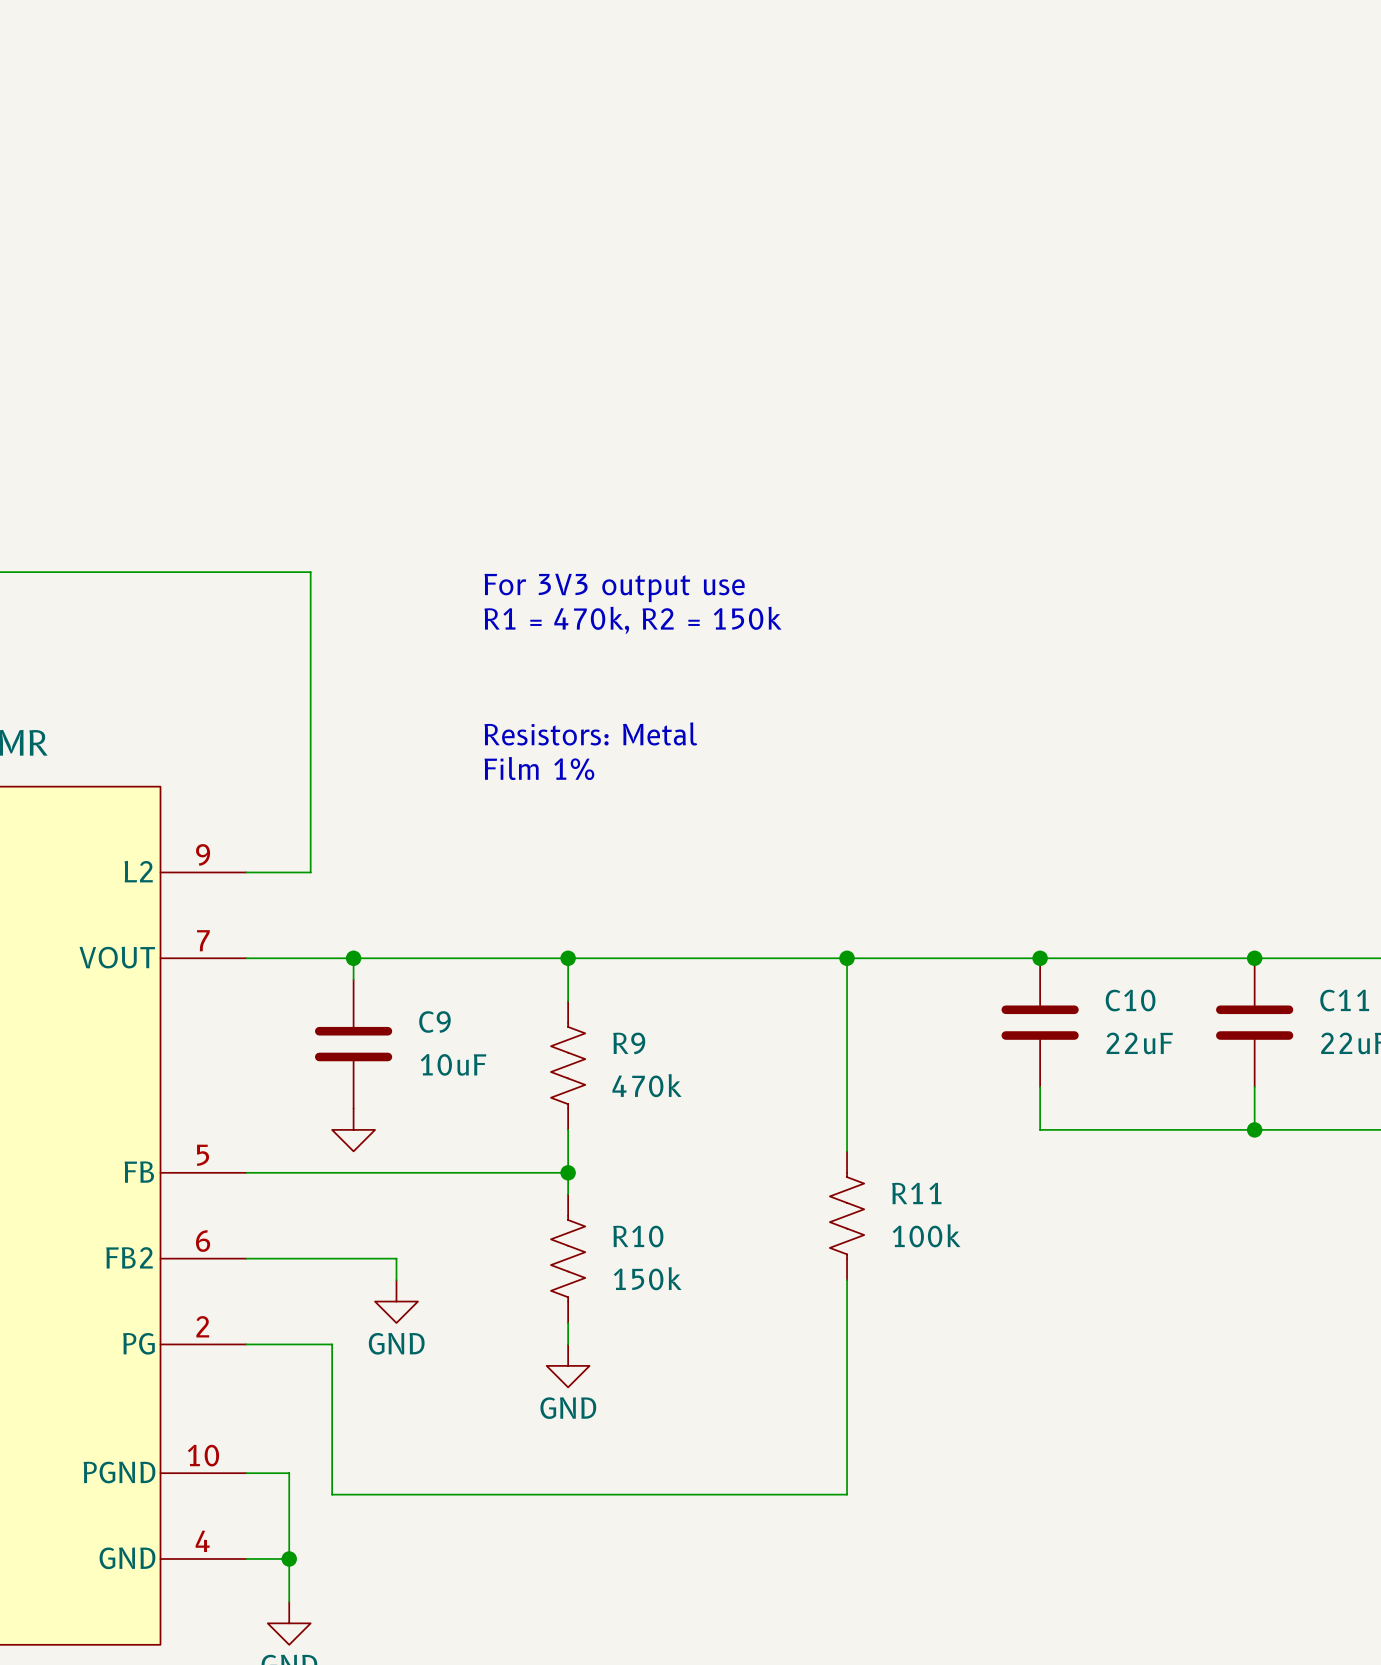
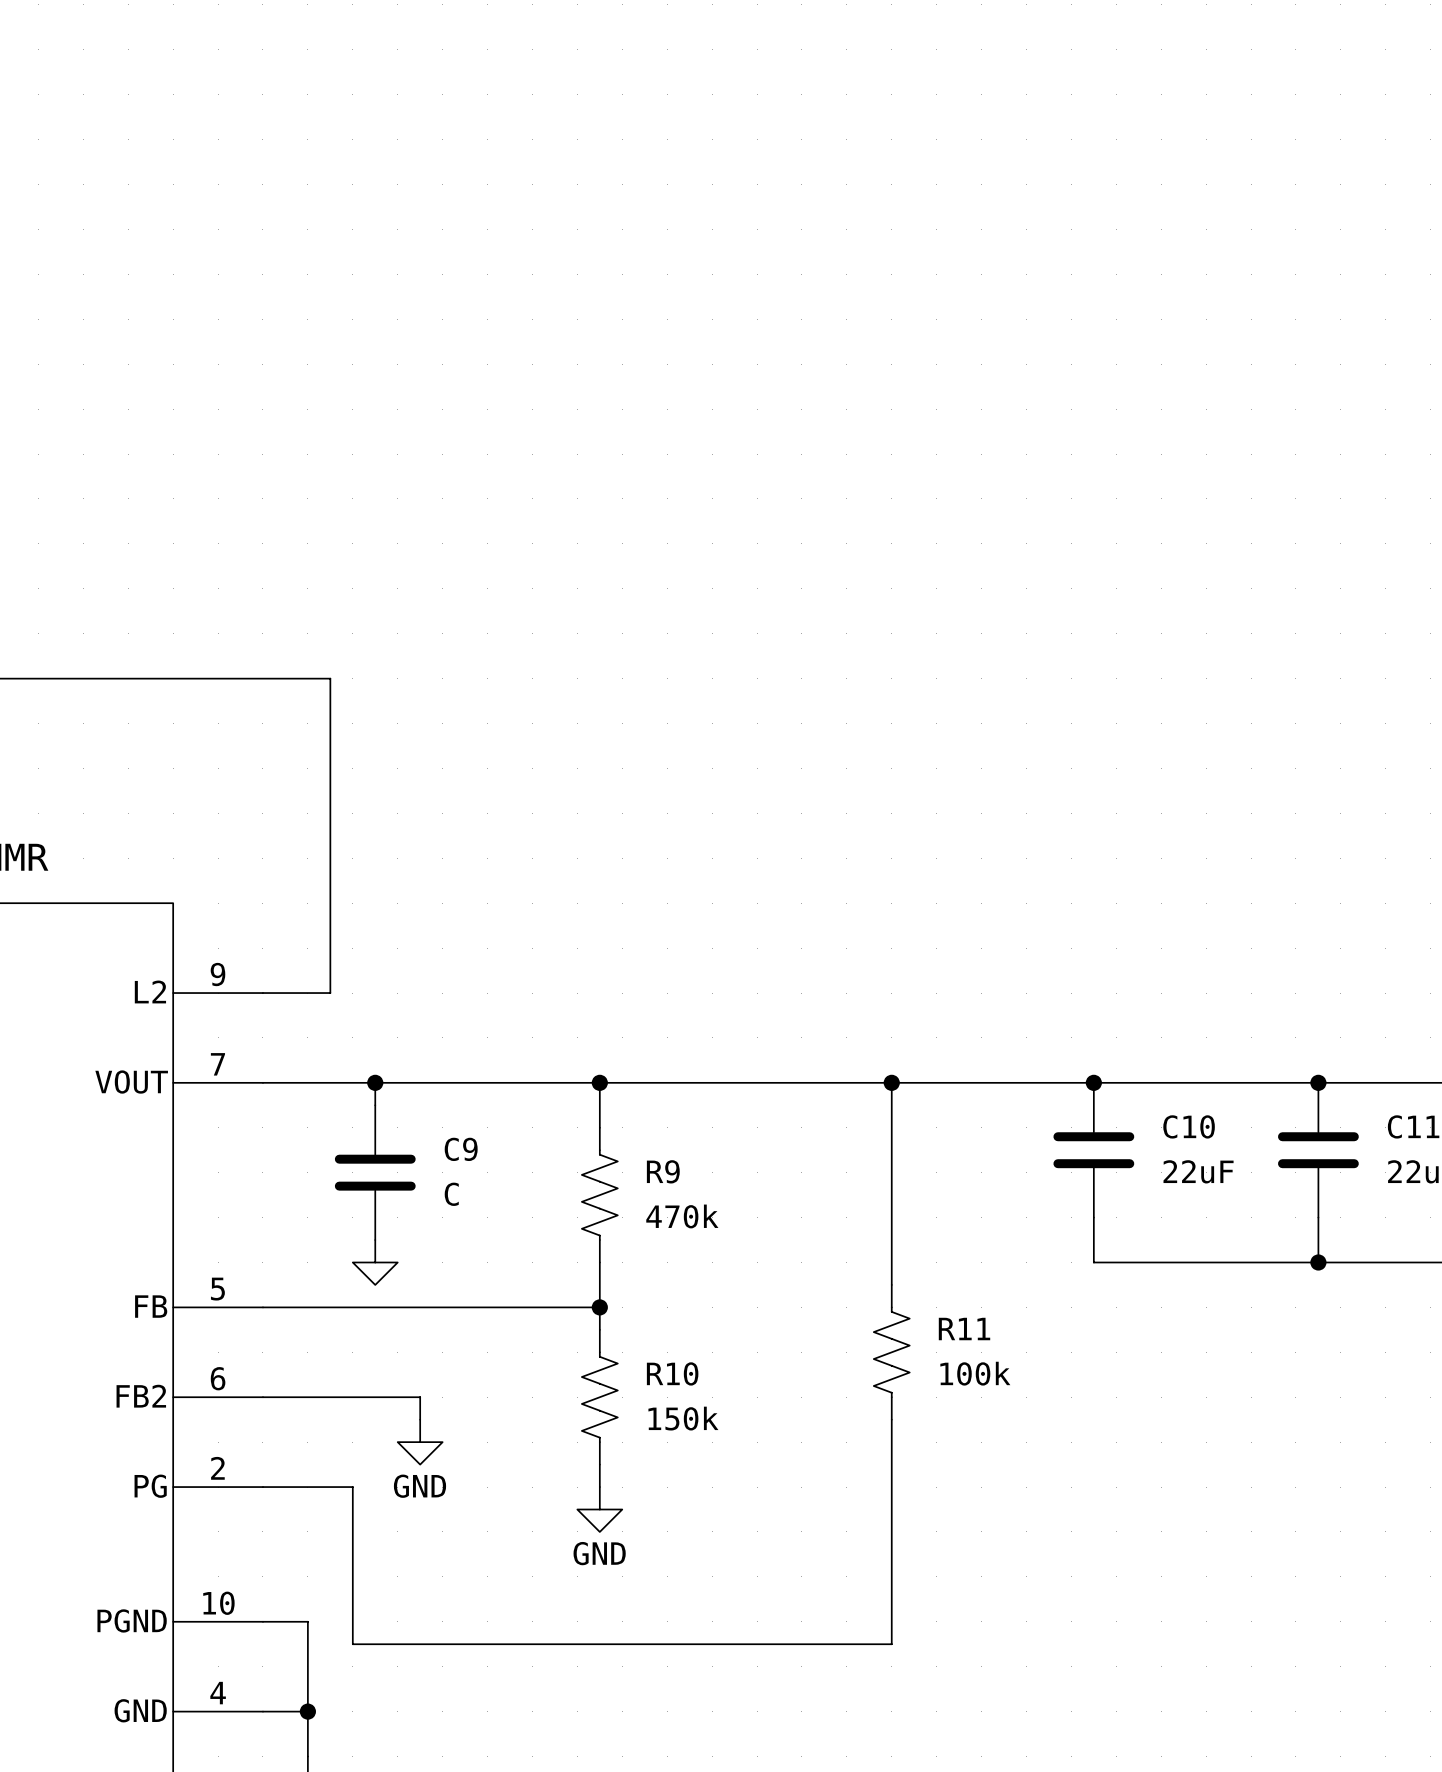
text: For 3V3 output use (614, 587) -> none
text: R1 = 470k, R2 = 150k (633, 620) -> none
text: Resistors: Metal (590, 733) -> none
text: Film 1% (539, 768) -> none
C9 value: 10uF (453, 1064) -> C (451, 1194)

